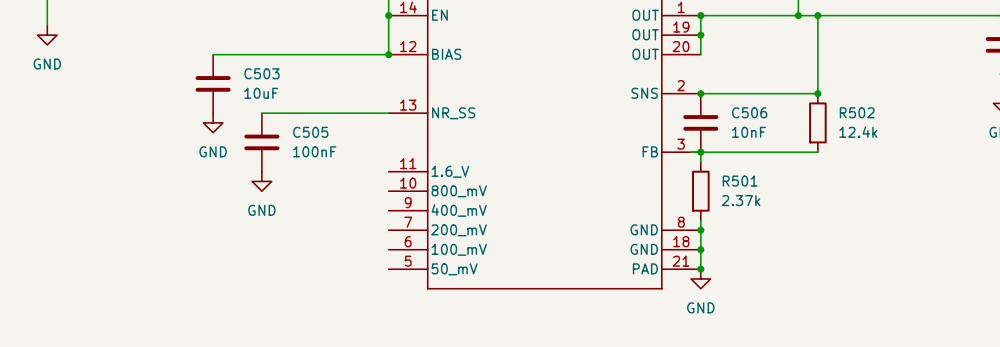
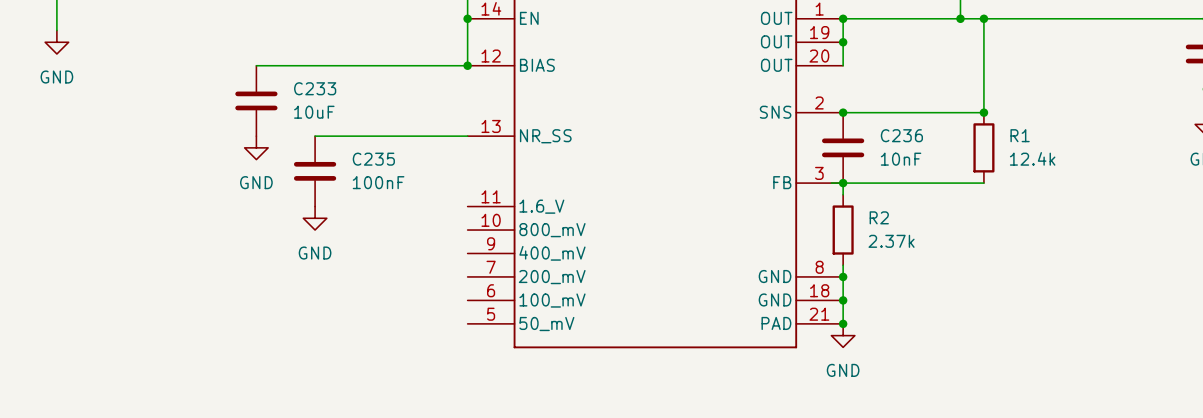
C503 name: C503 (261, 73) -> C233 (315, 88)
C506 name: C506 (749, 112) -> C236 (901, 135)
R502 name: R502 (857, 112) -> R1 (1020, 135)
C505 name: C505 (310, 132) -> C235 (373, 159)
R501 name: R501 (740, 181) -> R2 (879, 217)

